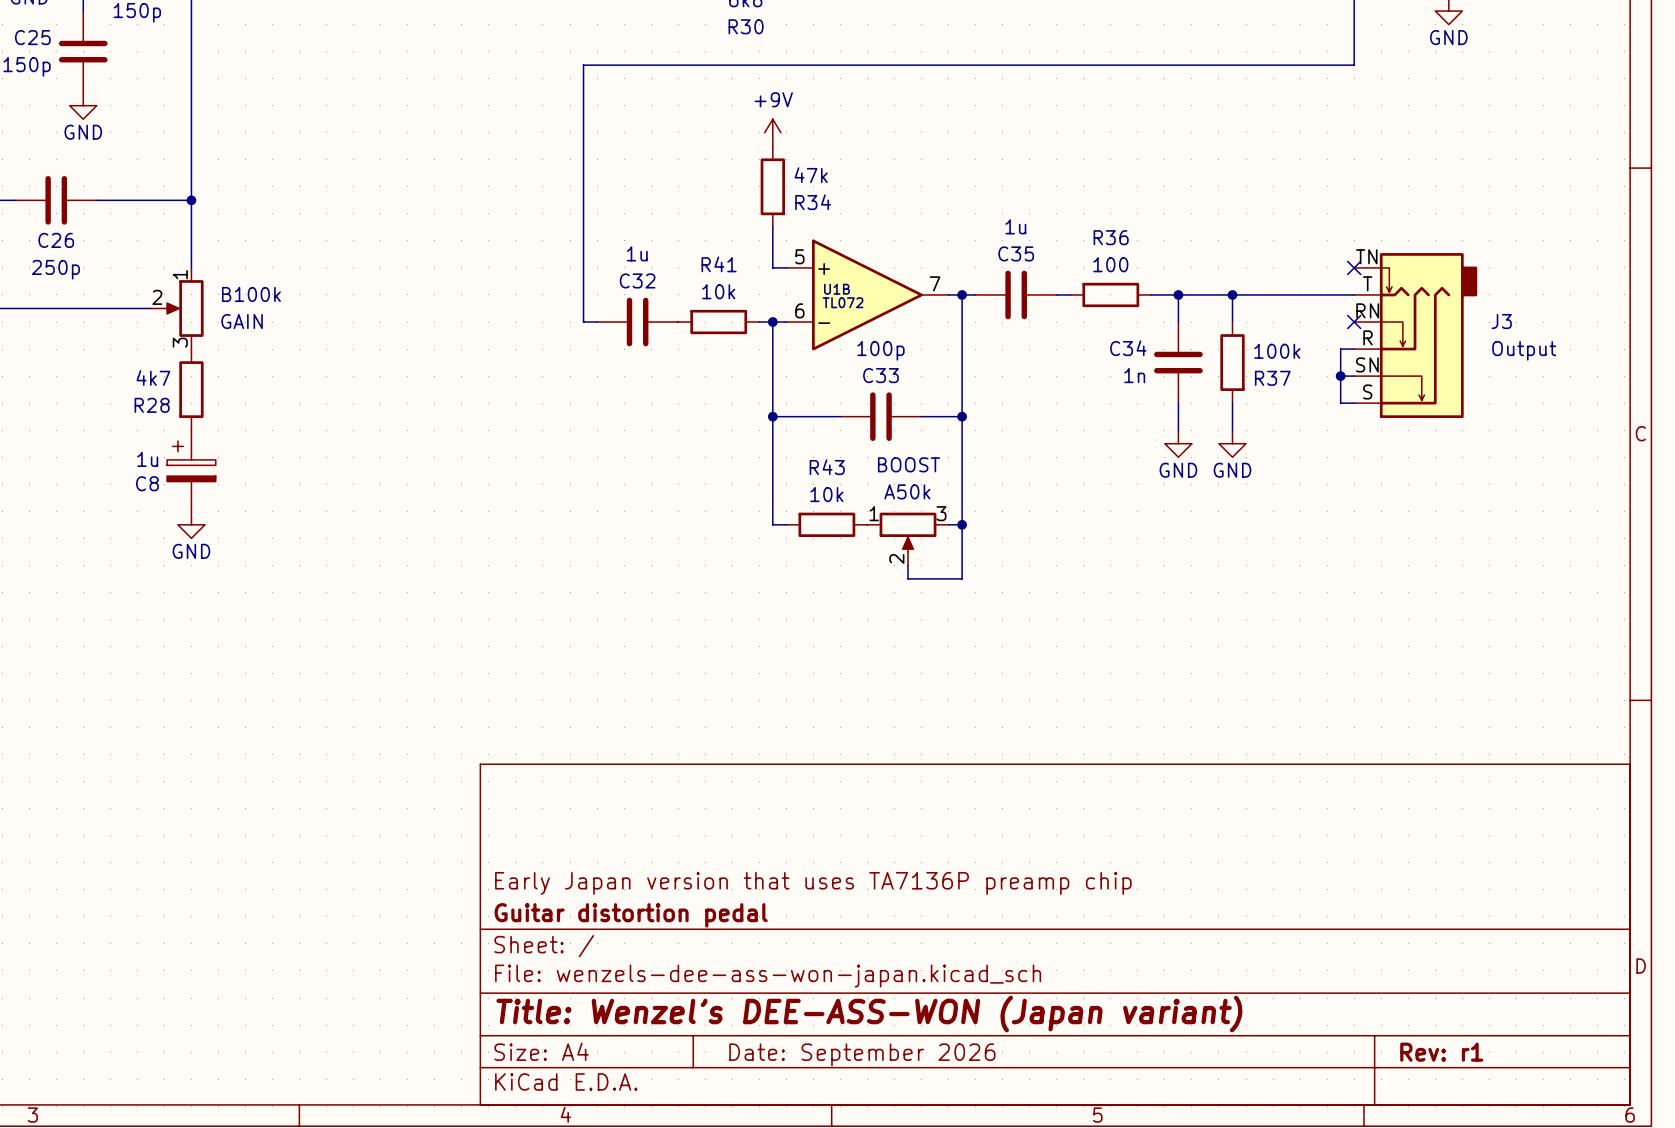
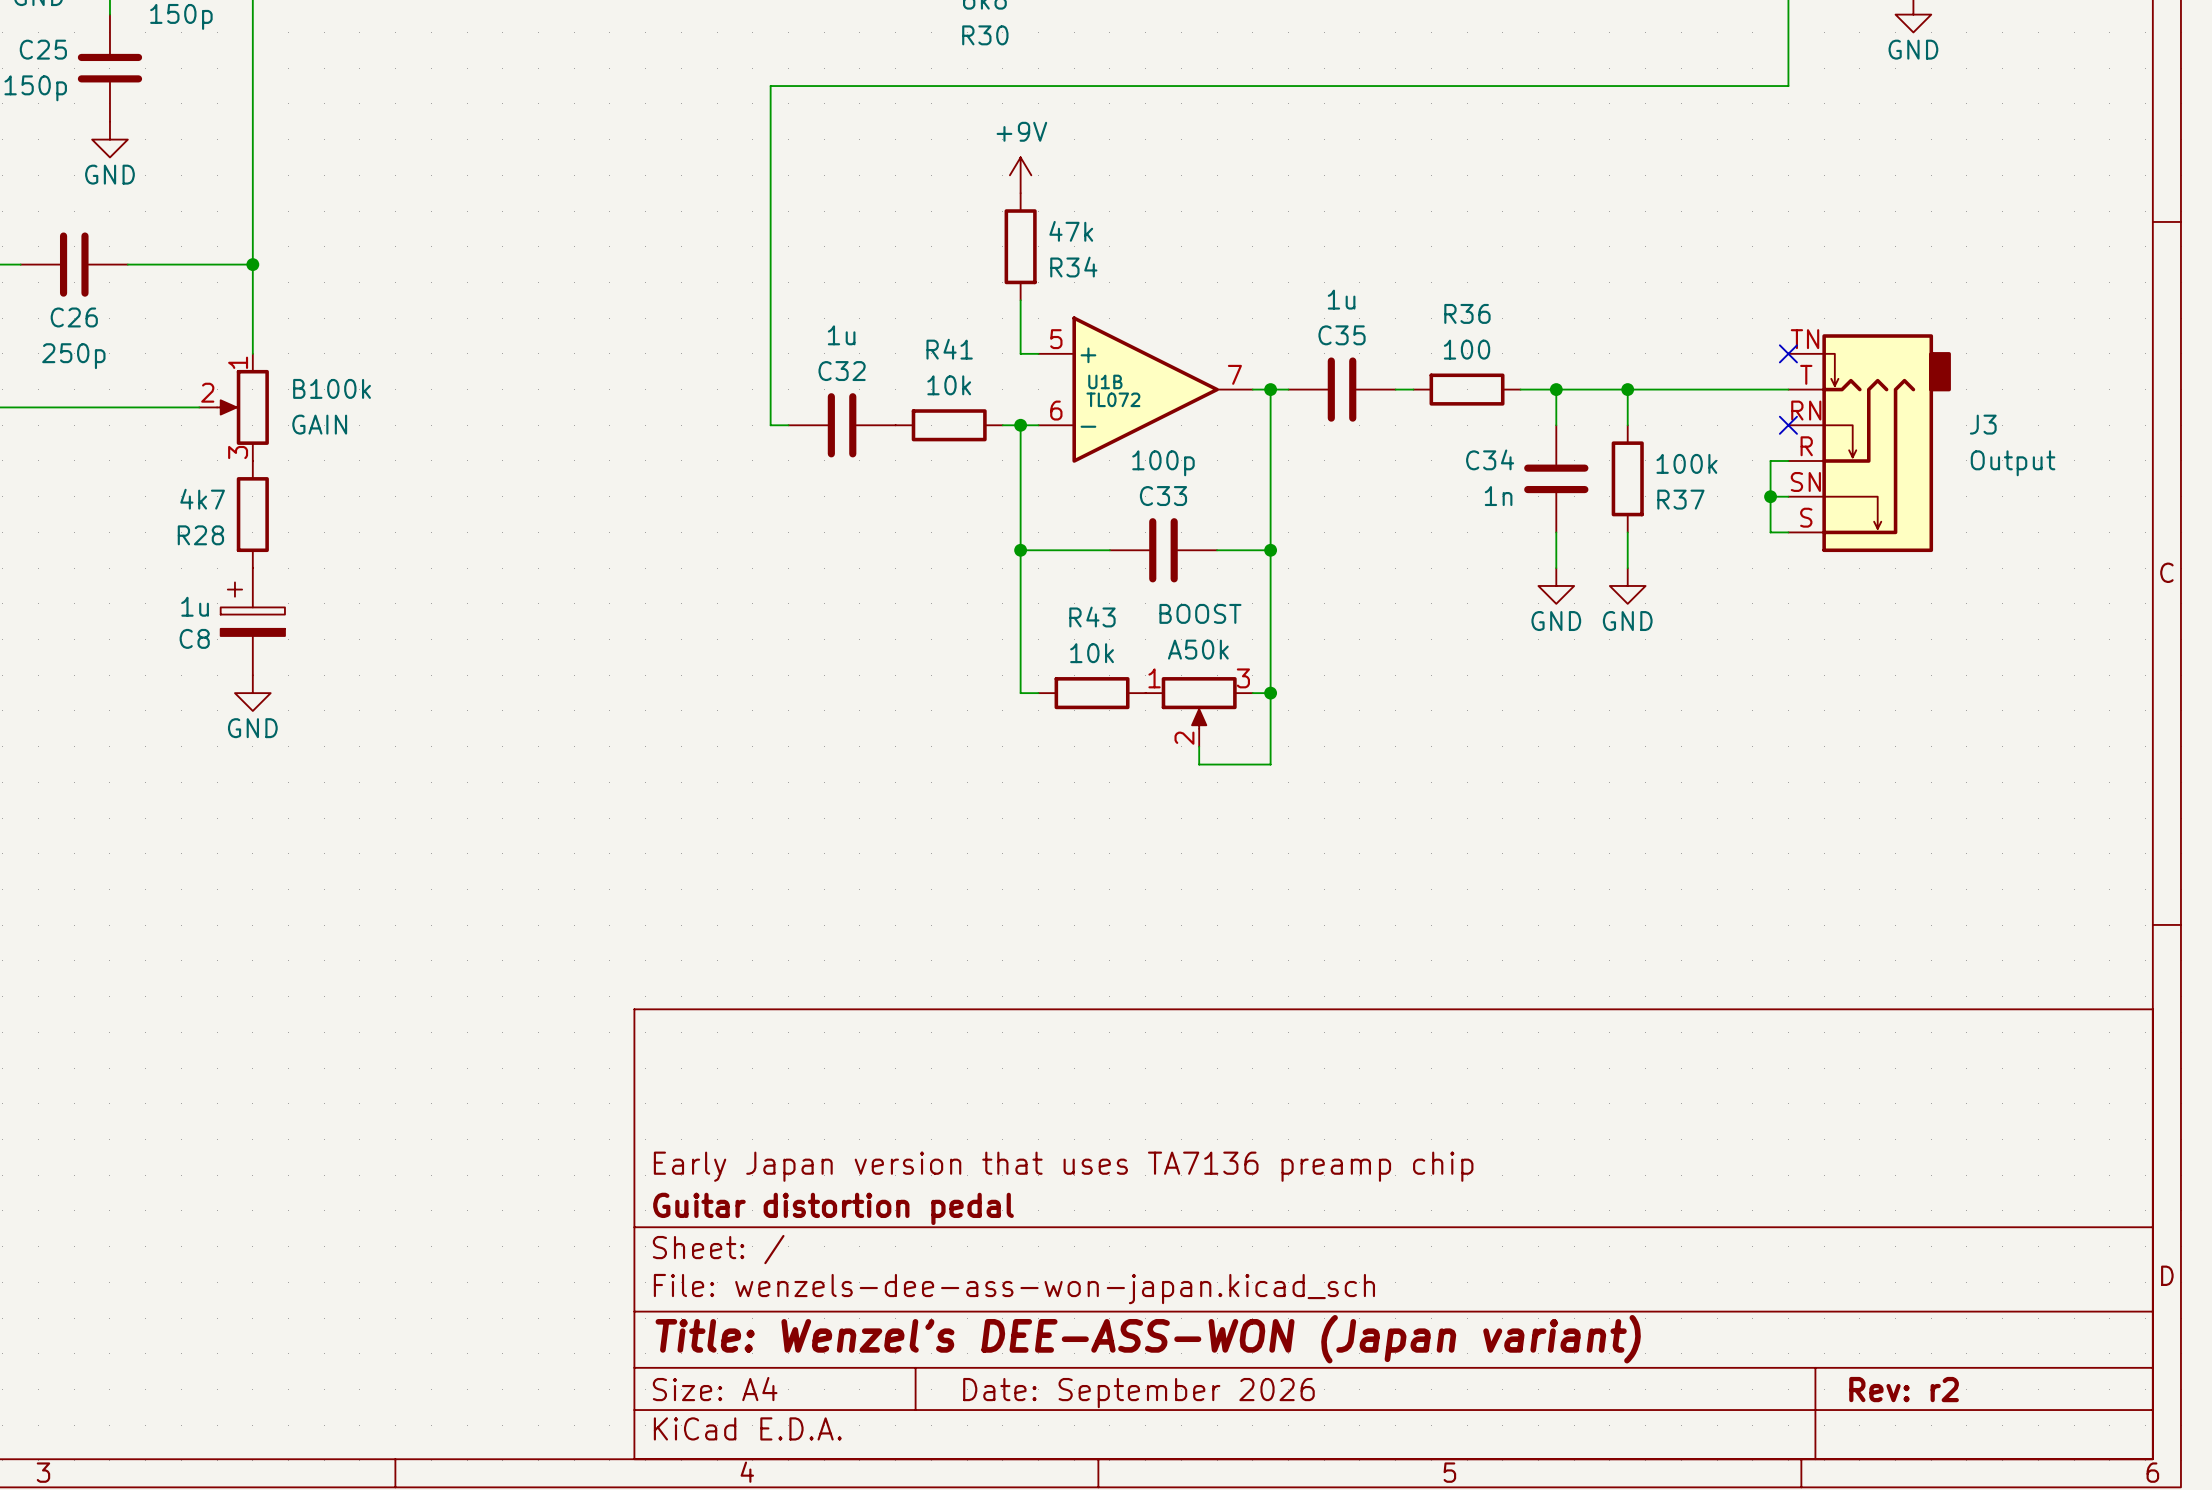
title block: Early Japan version that uses TA7136P preamp chip (813, 883) -> Early Japan version that uses TA7136 preamp chip (1063, 1166)
title block: Rev: r1 (1441, 1052) -> Rev: r2 (1904, 1389)

